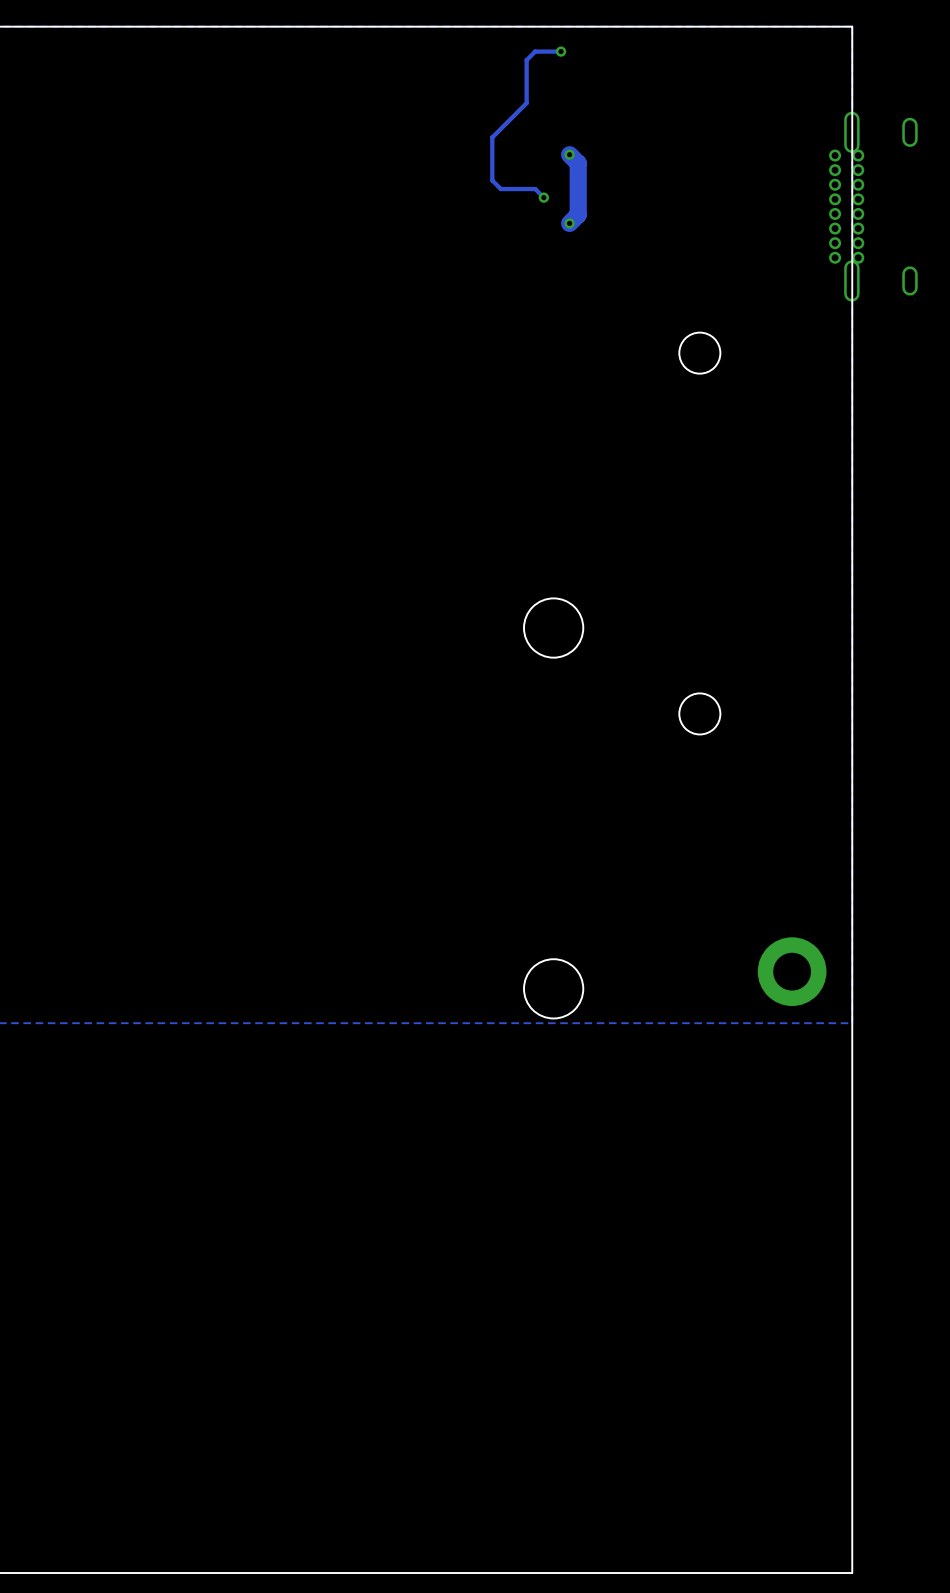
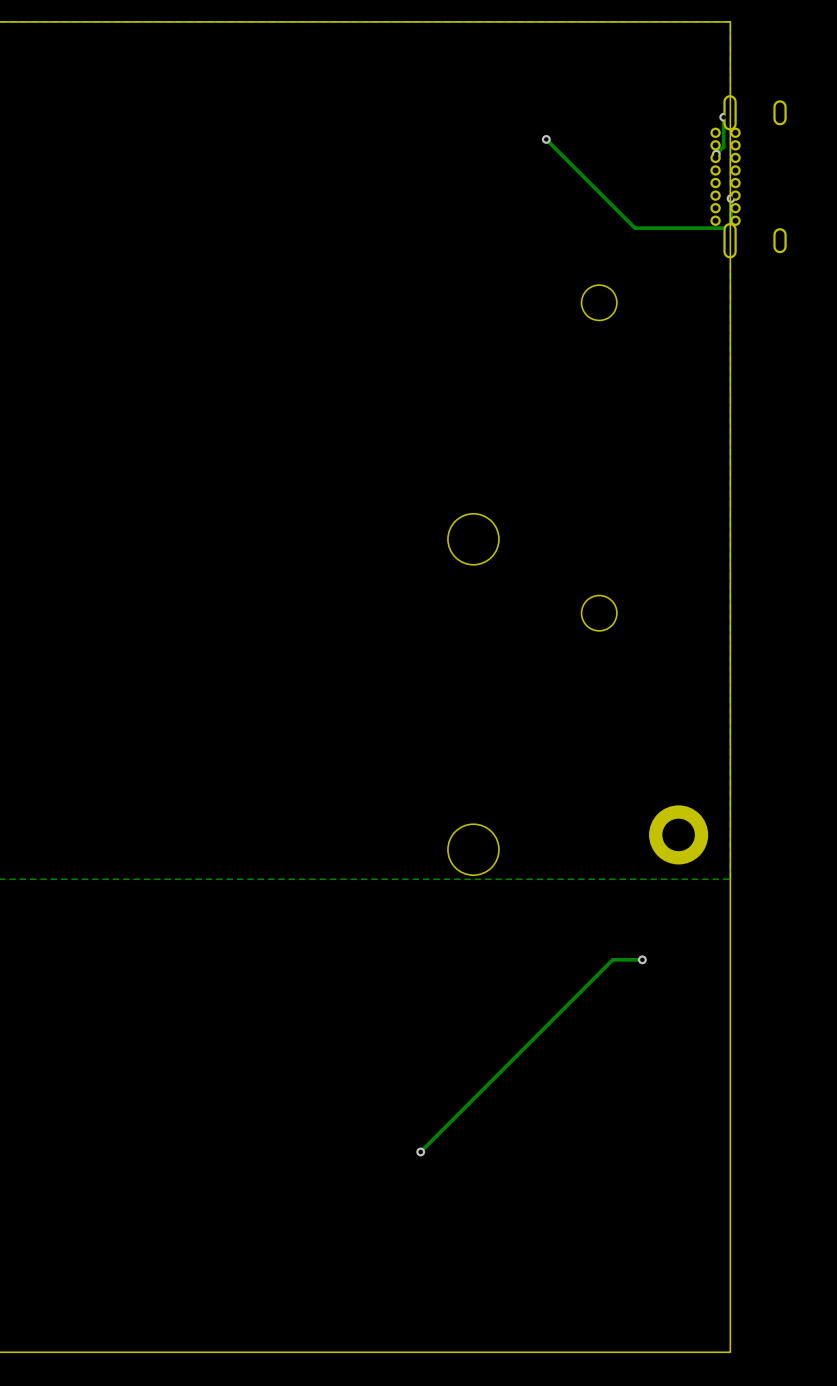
track: (561, 51) (535, 51) (526, 60) (526, 103) (492, 137) (492, 180) (500, 189) (535, 189) (543, 197) -> none
via: (561, 51) -> none
track: none -> (723, 117) (723, 146) (716, 154)
via: none -> (723, 117)
track: (569, 154) (578, 163) (578, 214) (569, 223) -> none
via: (569, 154) -> none
track: none -> (546, 139) (635, 228) (731, 228) (731, 198)
via: none -> (546, 139)
via: none -> (716, 154)
via: (543, 197) -> none
via: (569, 223) -> none
via: none -> (731, 198)
track: none -> (642, 959) (612, 959) (420, 1151)
via: none -> (642, 959)
via: none -> (420, 1151)

